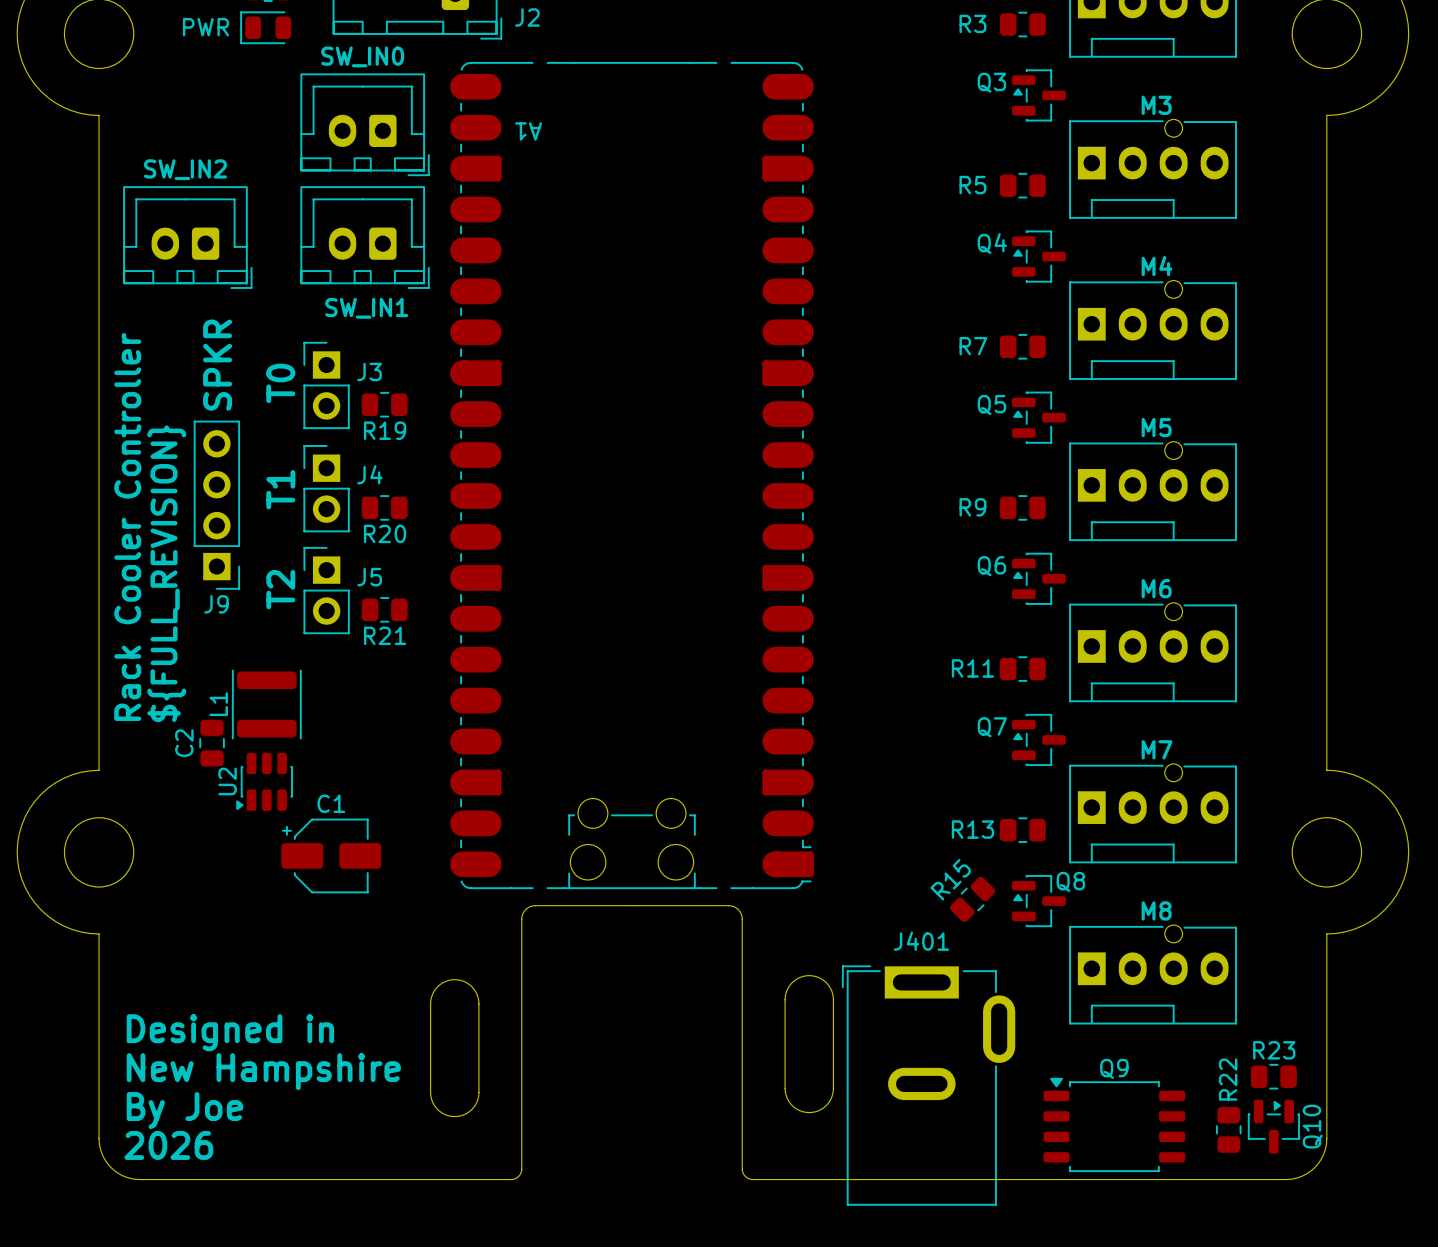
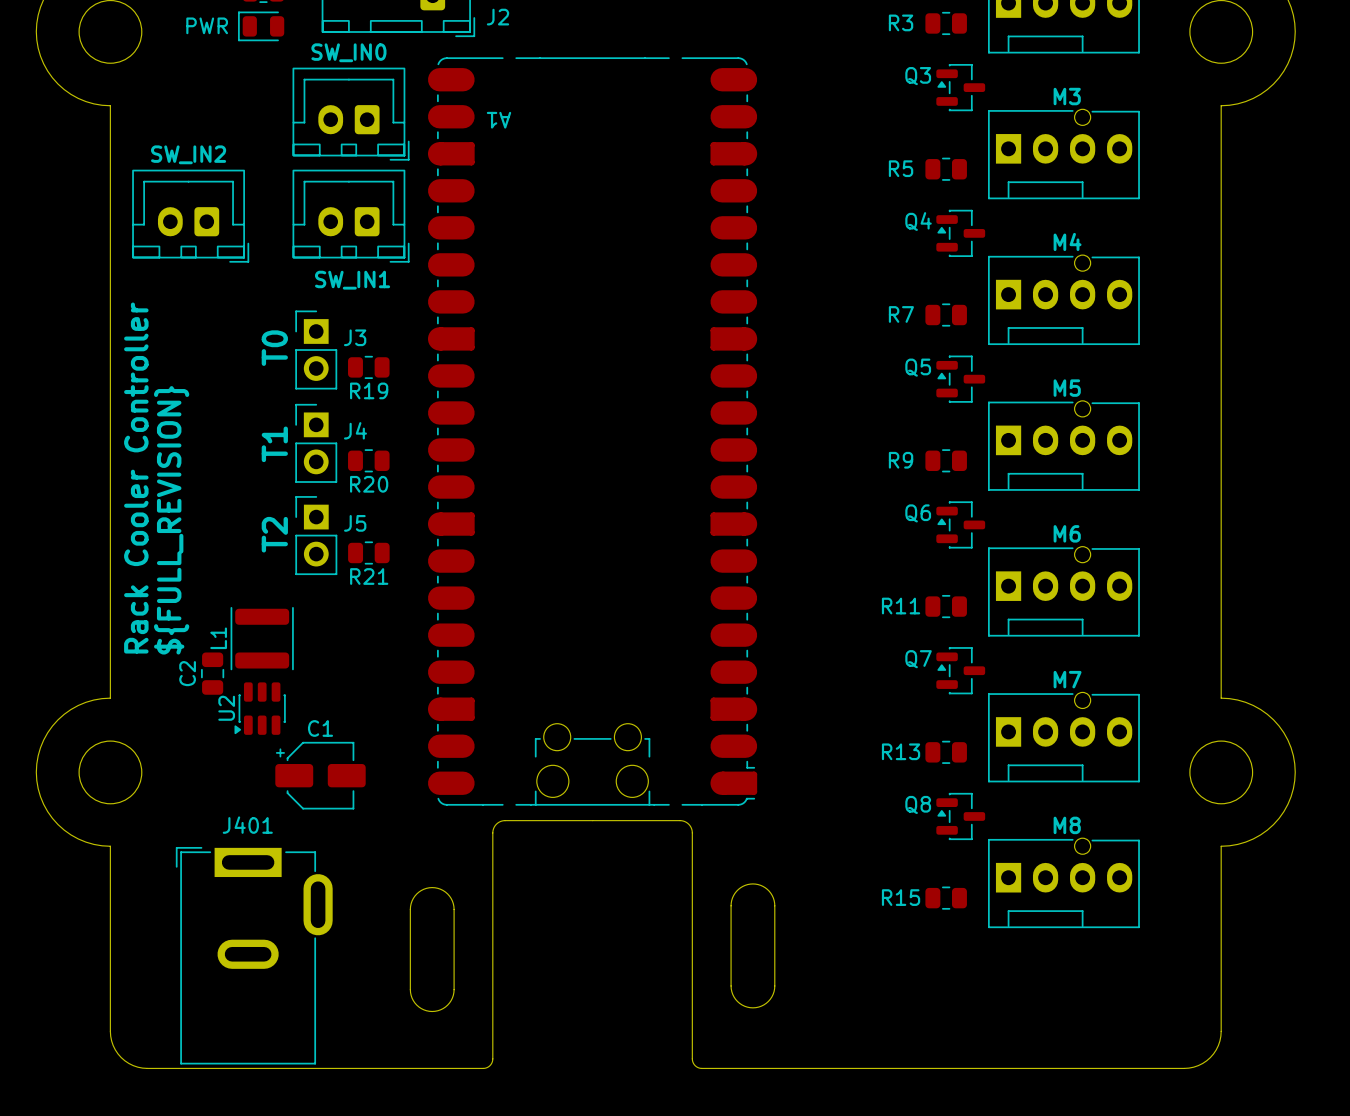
text: SPKR (217, 365) -> none
J9: (216, 505) -> none
R15 name position: R15 (950, 879) -> R15 (901, 897)
Q8 name position: Q8 (1070, 881) -> Q8 (918, 804)
R15 rotation: 0° (972, 899) -> 45° clockwise (946, 898)
R15 position: (972, 899) -> (946, 898)
text: Designed in (230, 1032) -> none
text: New Hampshire (263, 1071) -> none
R23: (1273, 1076) -> none
J401 position: (928, 1085) -> (254, 955)
text: By Joe (184, 1110) -> none
Q9: (1114, 1124) -> none
Q10: (1273, 1126) -> none
R22: (1228, 1129) -> none
text: 2026 (168, 1145) -> none

